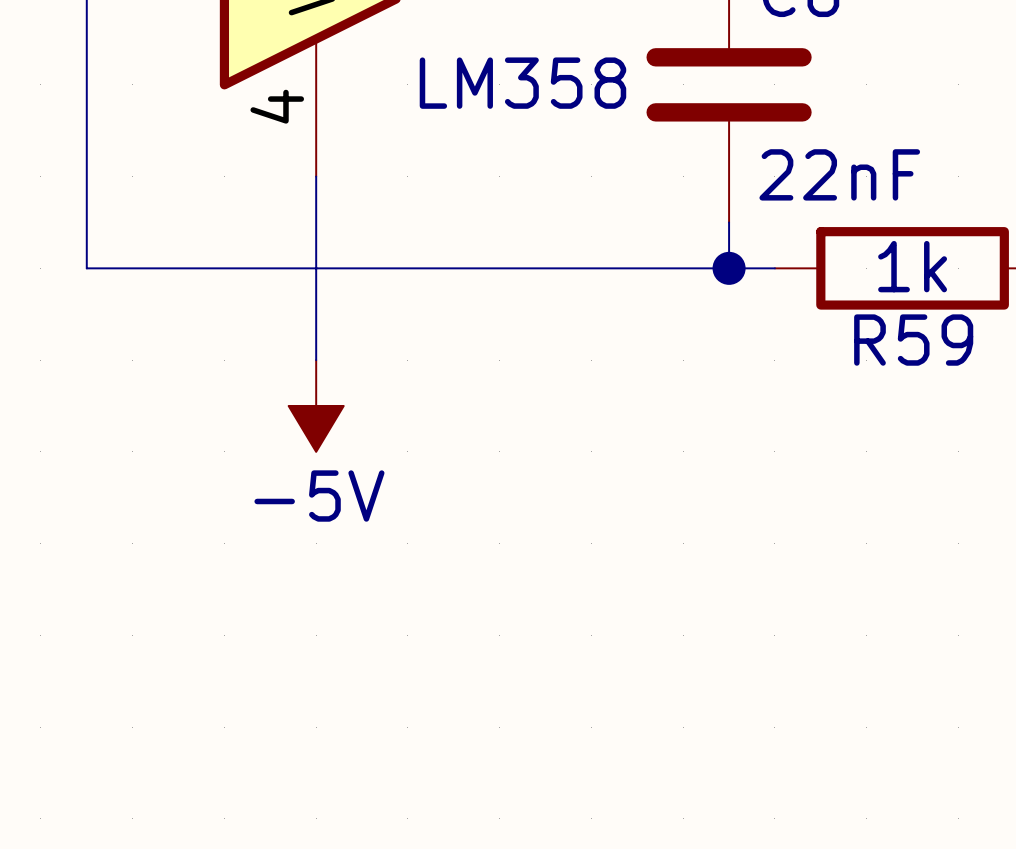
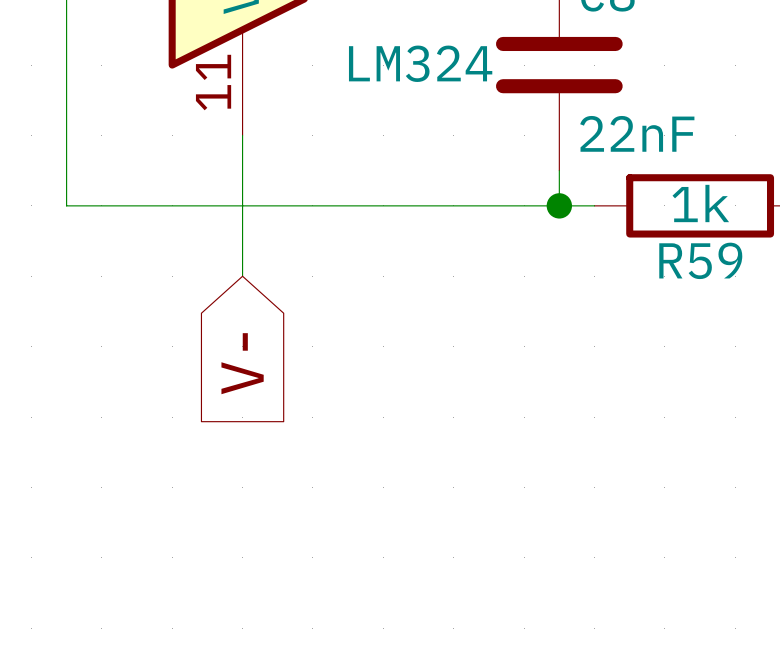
part value: LM358 (522, 83) -> LM324 (420, 63)
part pin number: 4 (277, 106) -> 11 (213, 82)
power symbol: -5V (316, 405) -> none
global label: none -> V- (242, 363)

